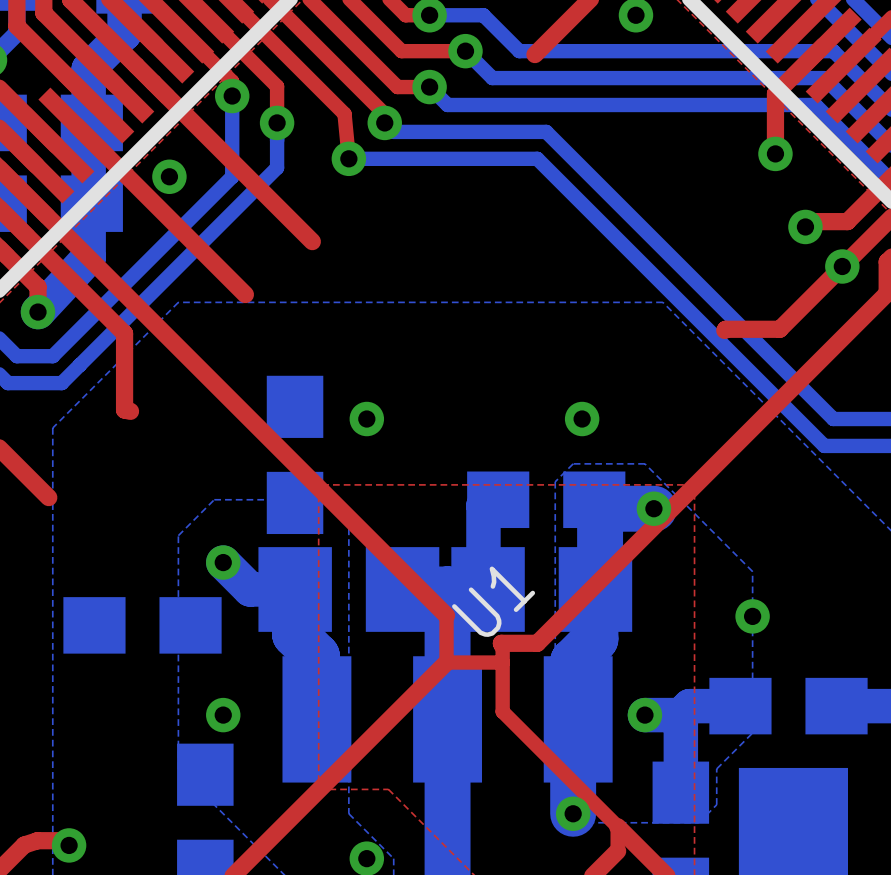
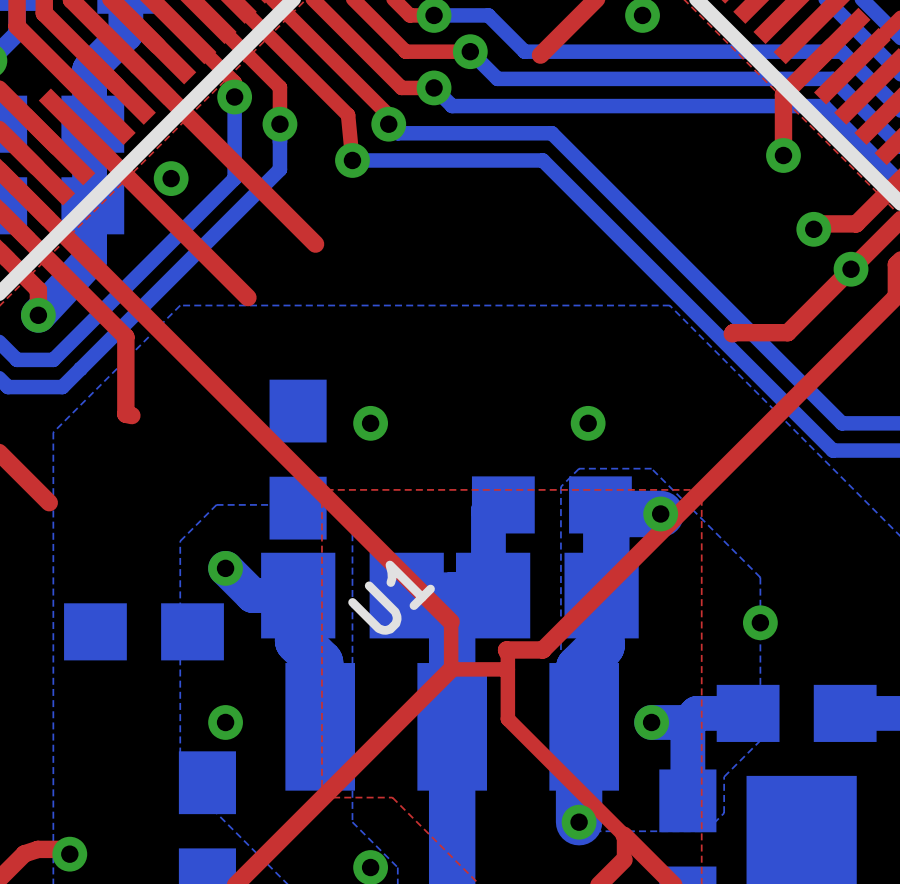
U1 name position: U1 (493, 601) -> U1 (391, 597)

